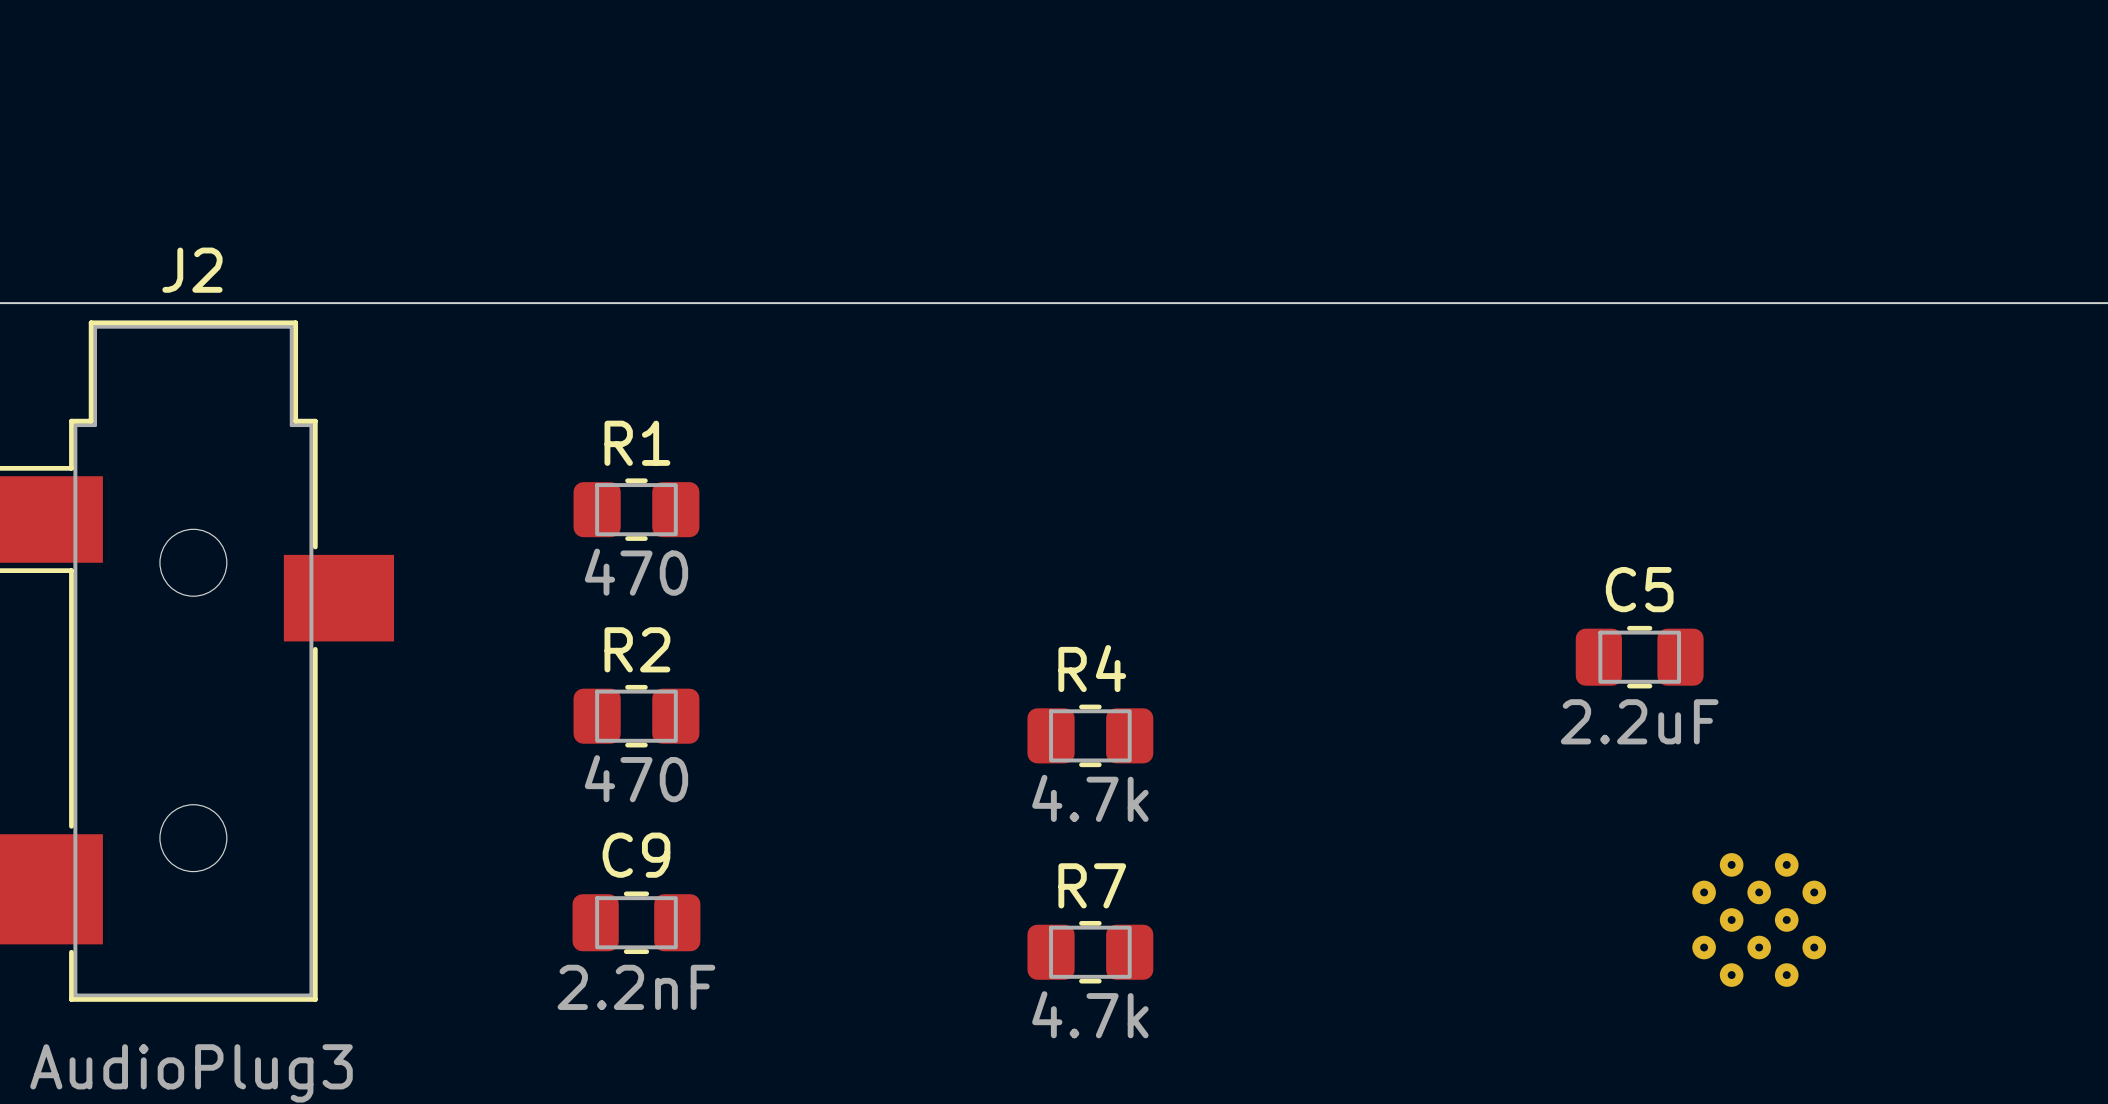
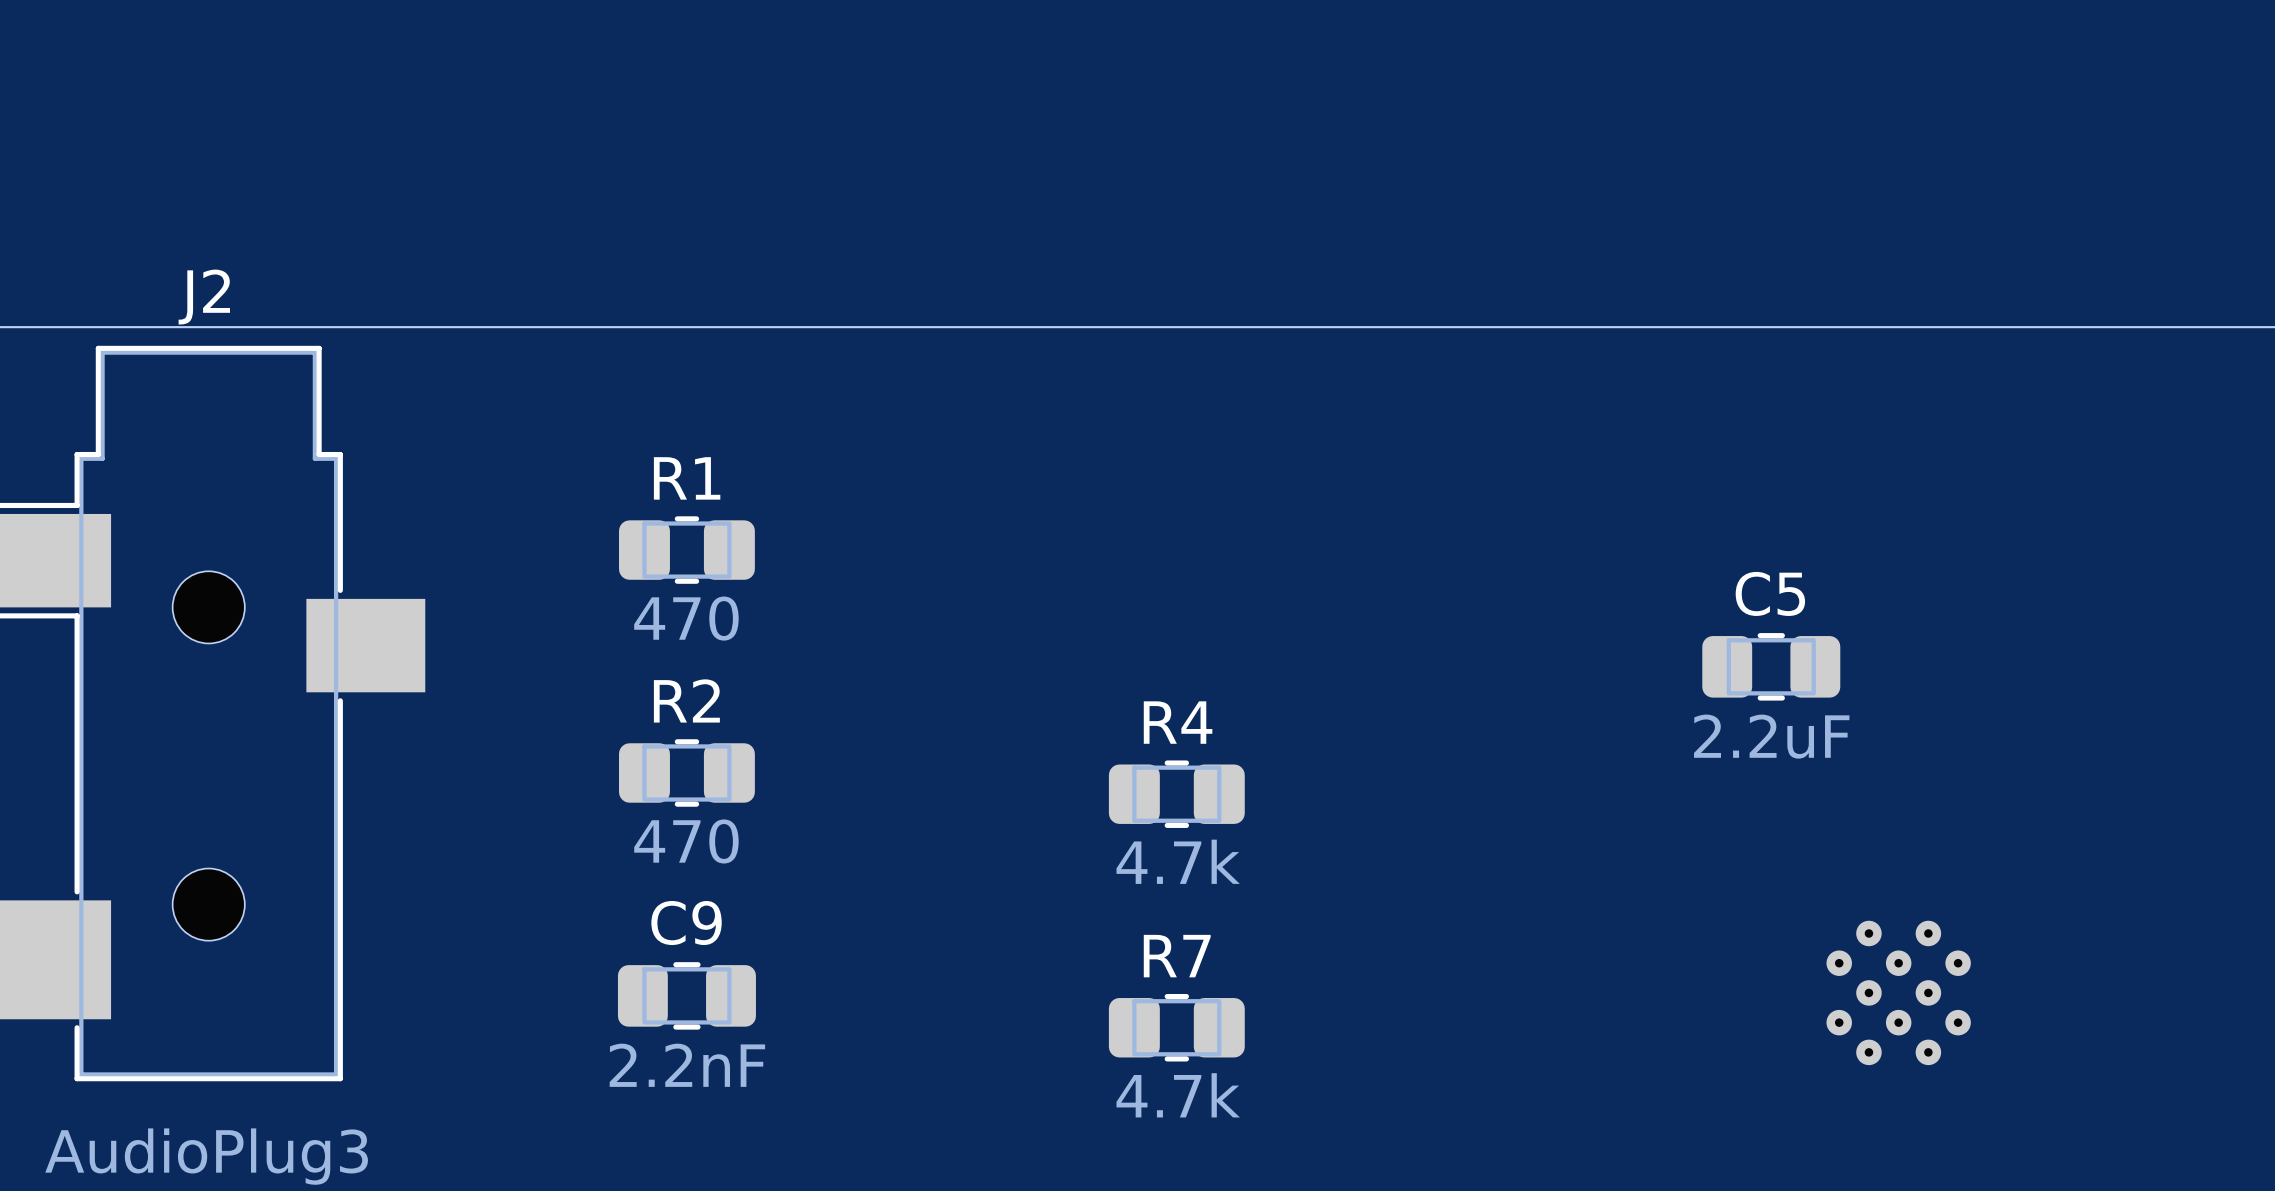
C5 position: (1639, 657) -> (1771, 666)

